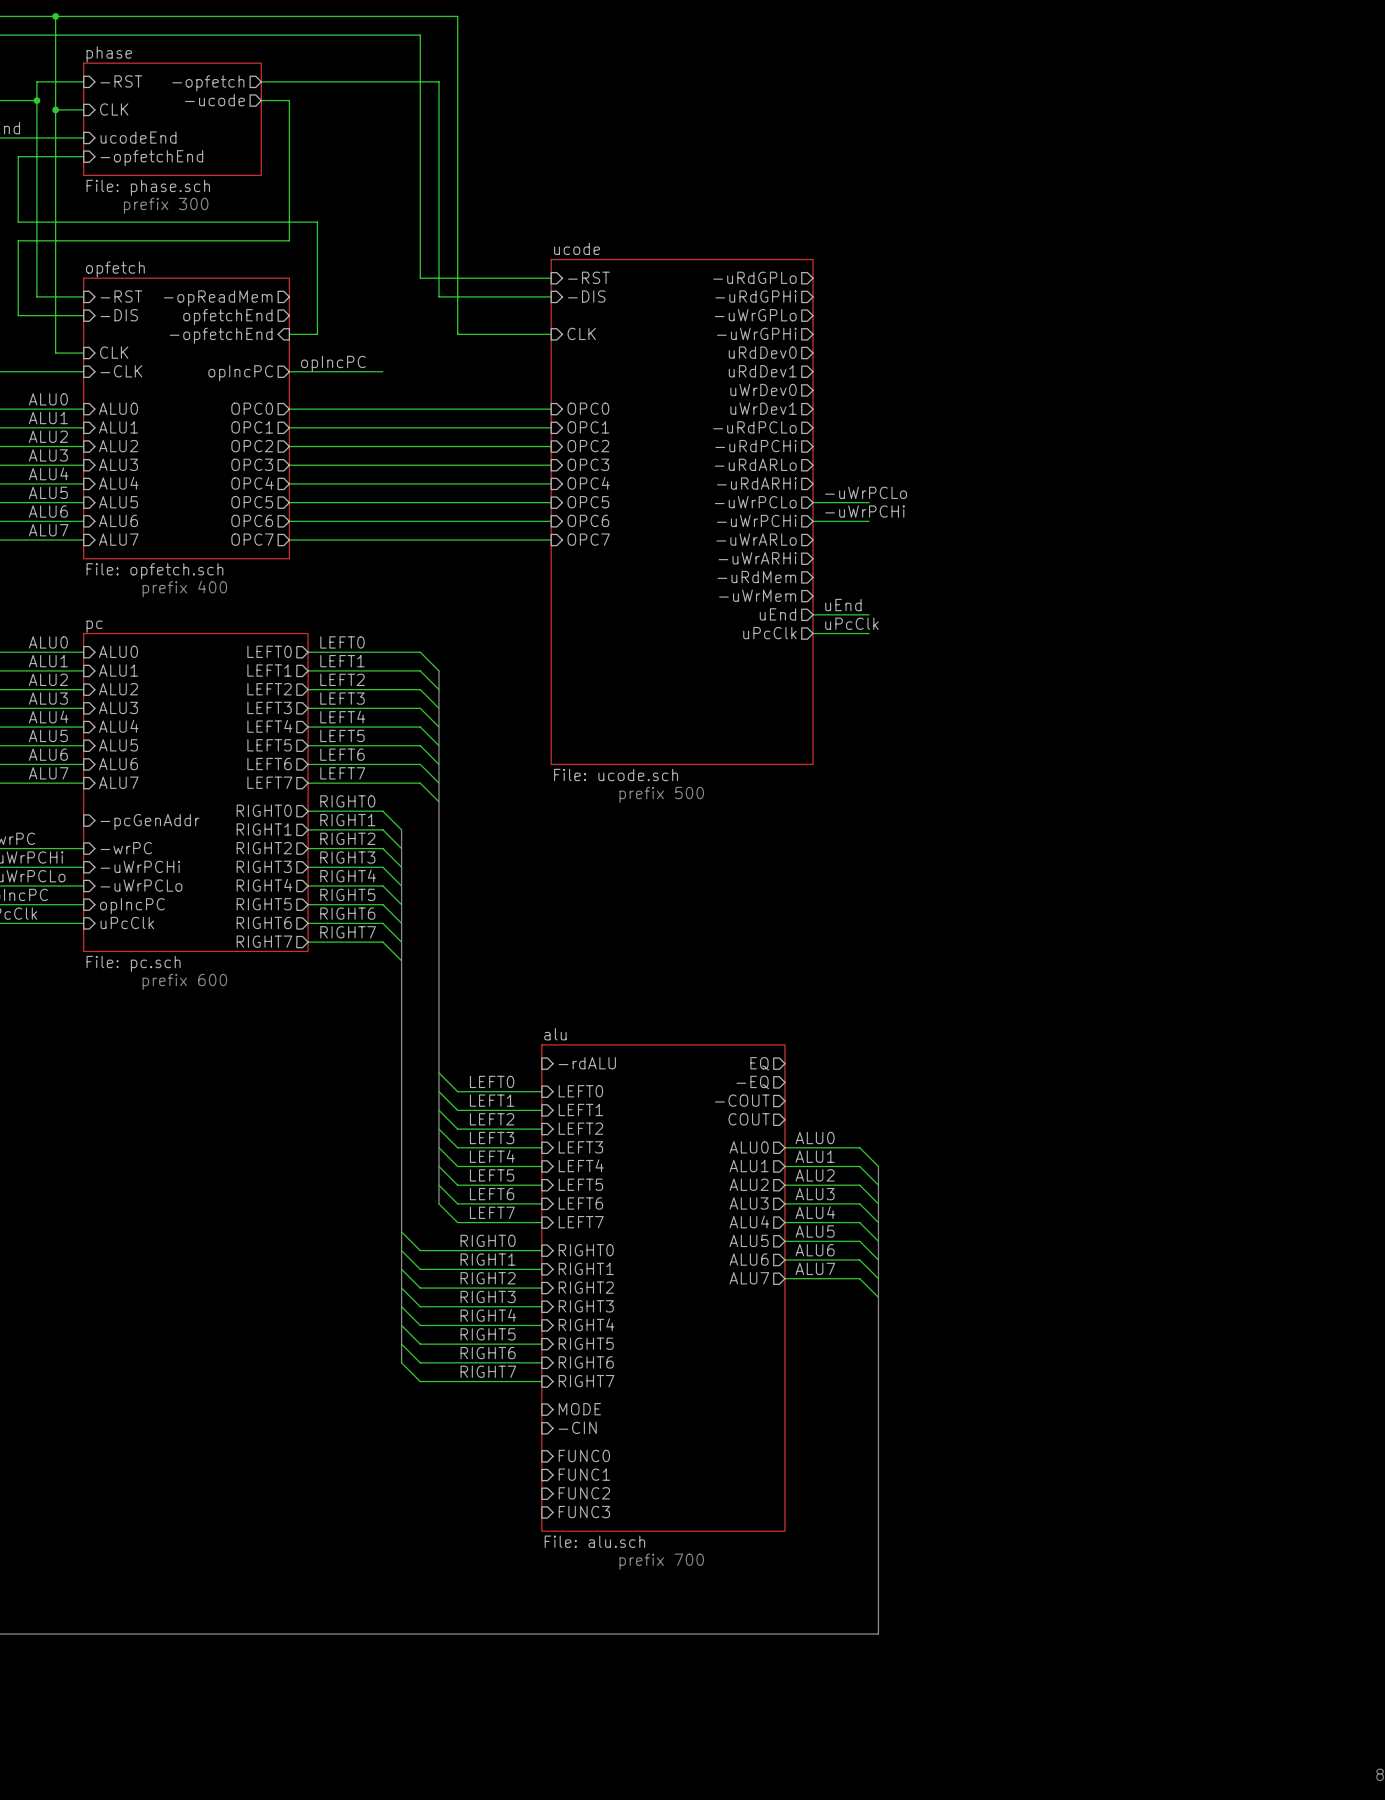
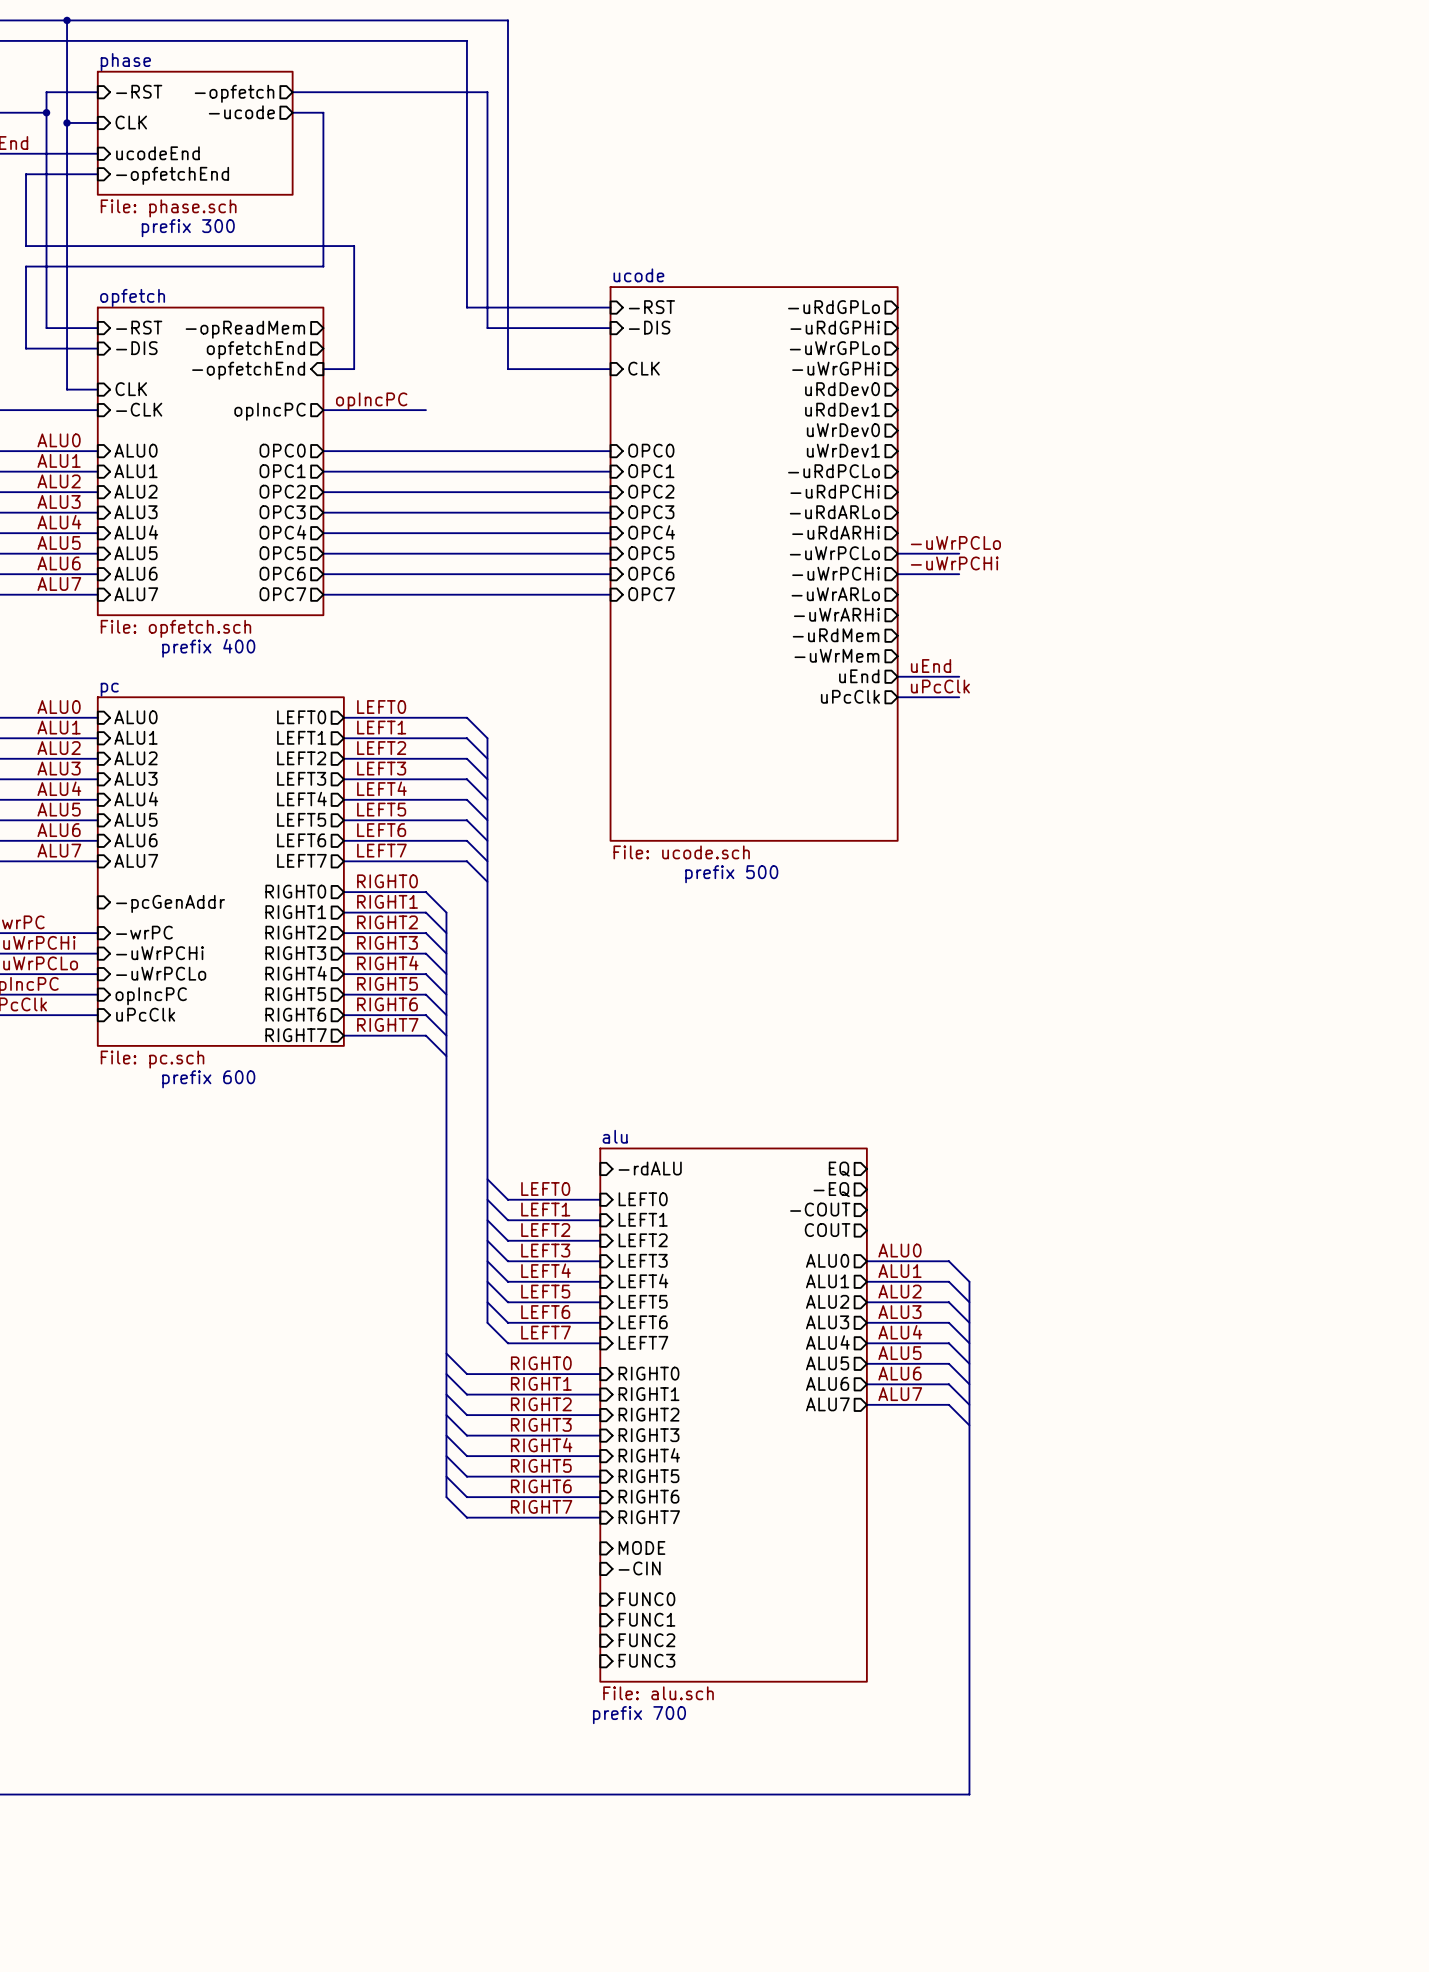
text position: prefix 700 (661, 1561) -> prefix 700 (639, 1715)

